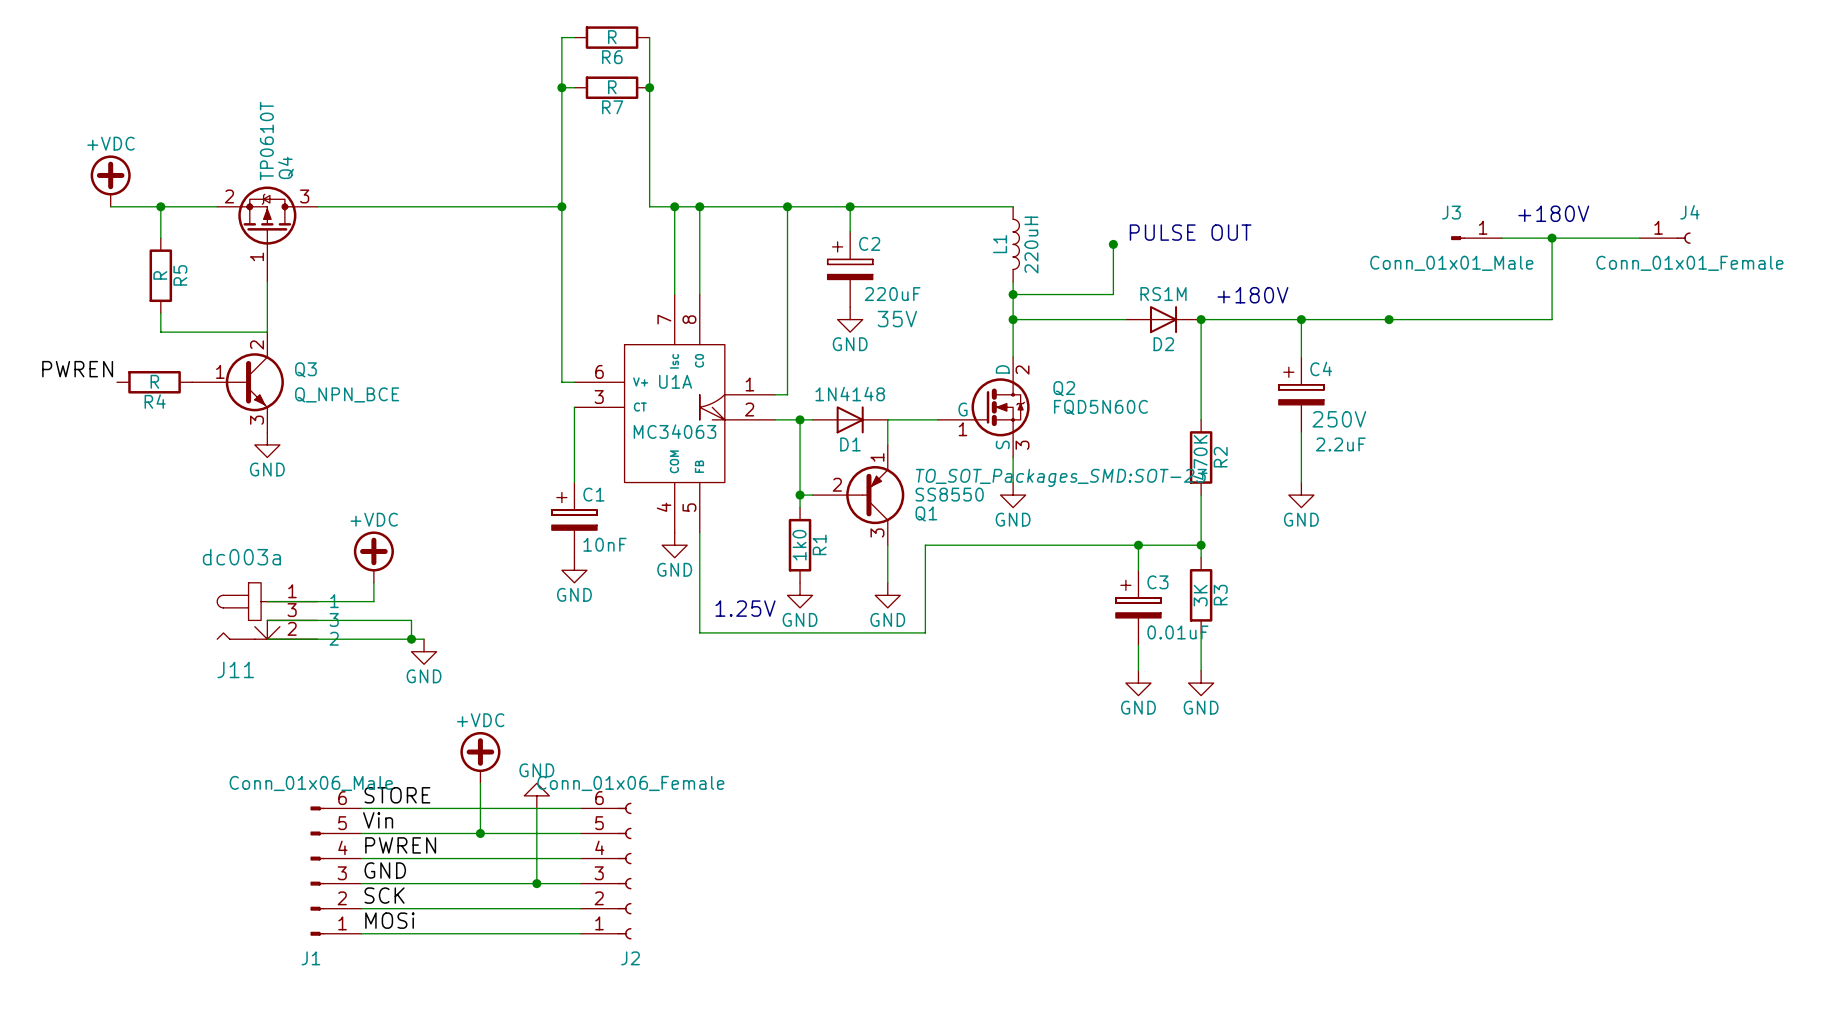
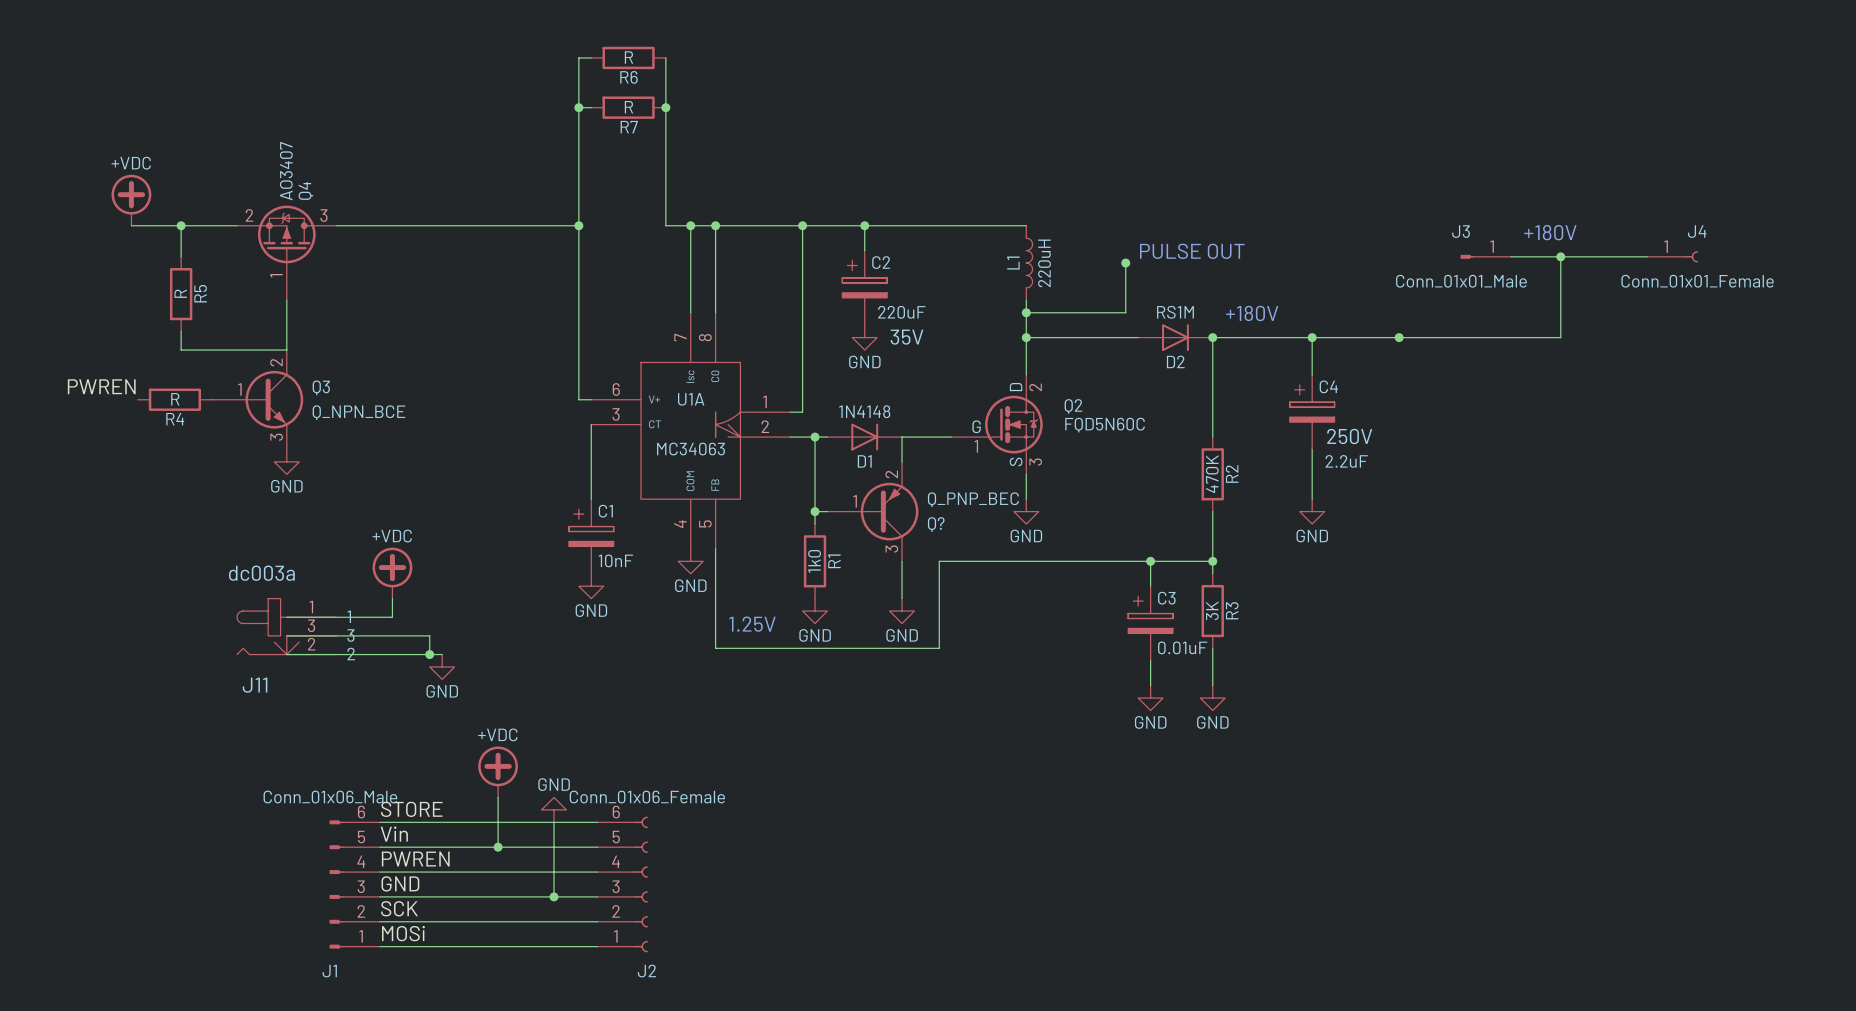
Q4 value: TP0610T (266, 141) -> AO3407 (286, 171)
Q1: SS8550 (858, 495) -> none
Q?: none -> Q_PNP_BEC (872, 511)

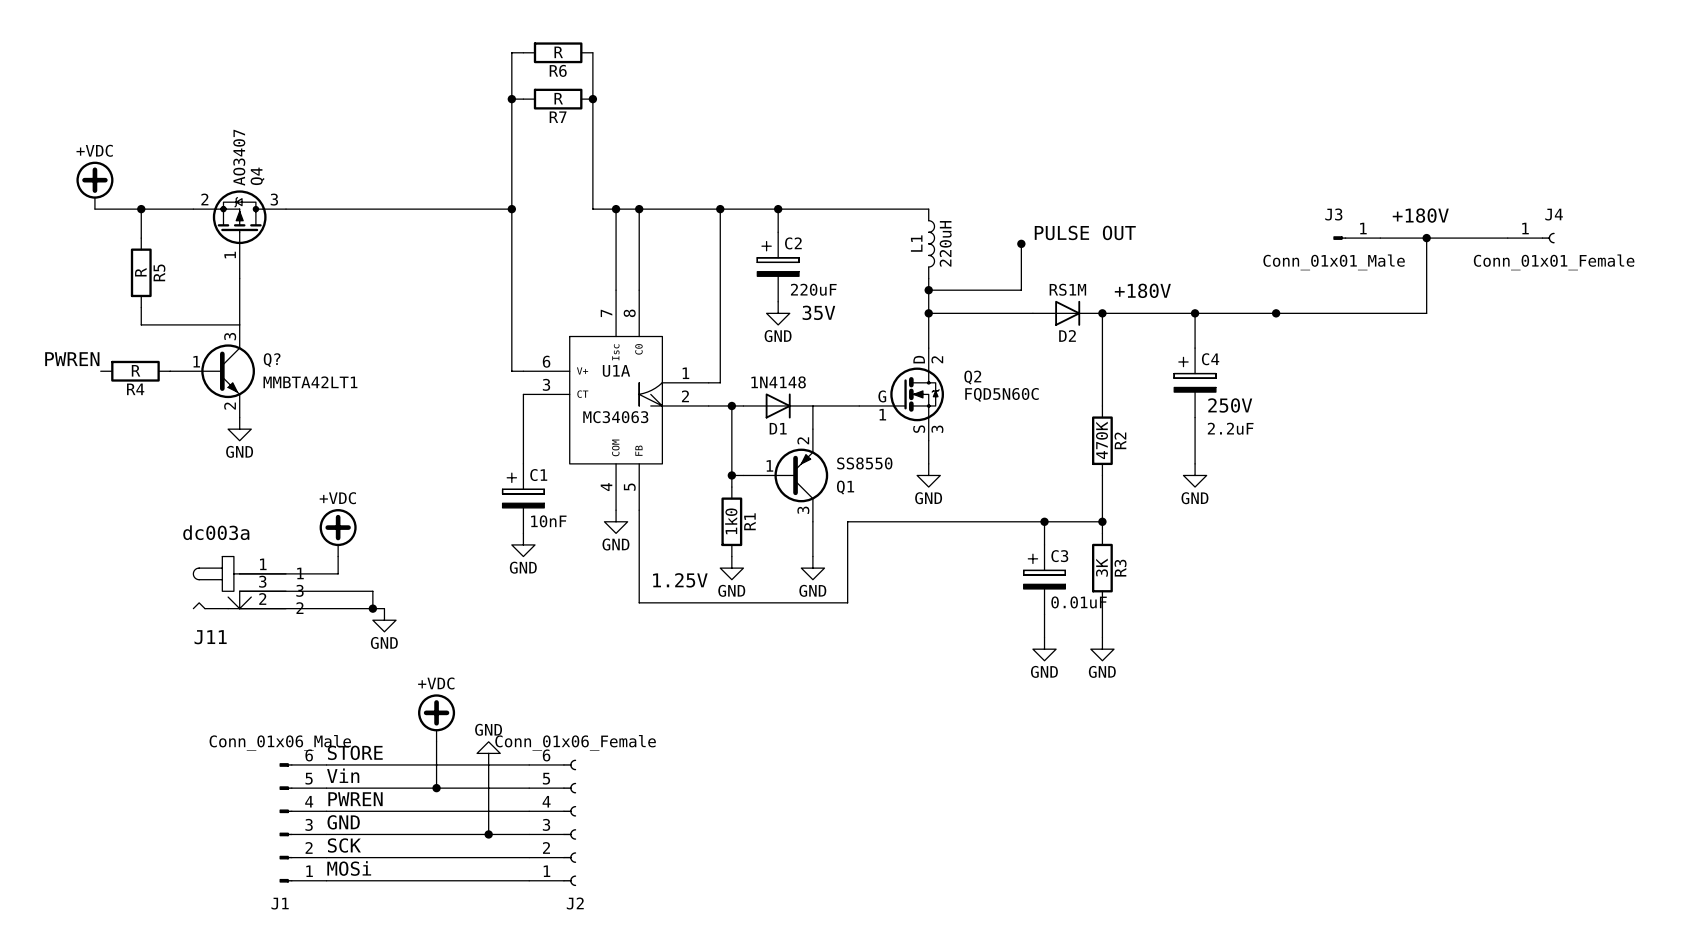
Q3 pin number: 2 (276, 362) -> 3 (230, 336)
Q3 name: Q3 (321, 387) -> Q? (272, 360)
Q3 value: Q_NPN_BCE (358, 412) -> MMBTA42LT1 (310, 382)
Q3 pin number: 3 (276, 437) -> 2 (230, 406)
Q? value: Q_PNP_BEC (973, 499) -> SS8550 (864, 463)
Q? name: Q? (936, 524) -> Q1 (845, 487)

